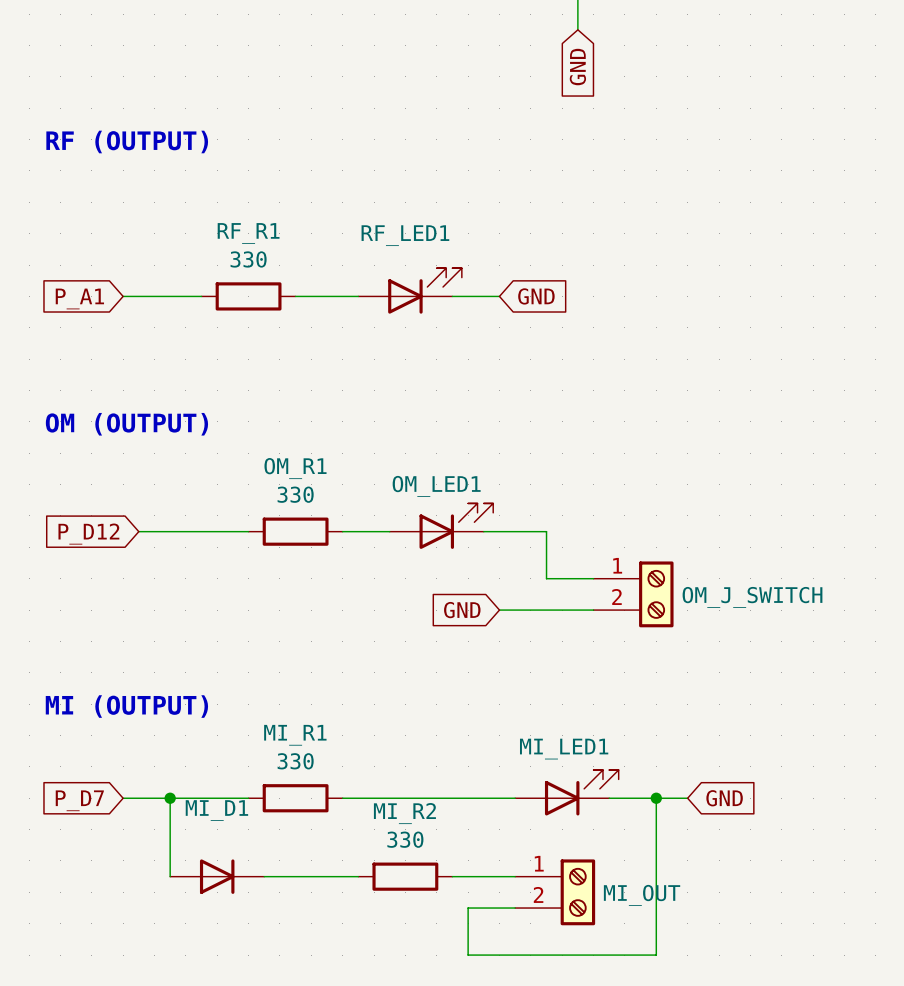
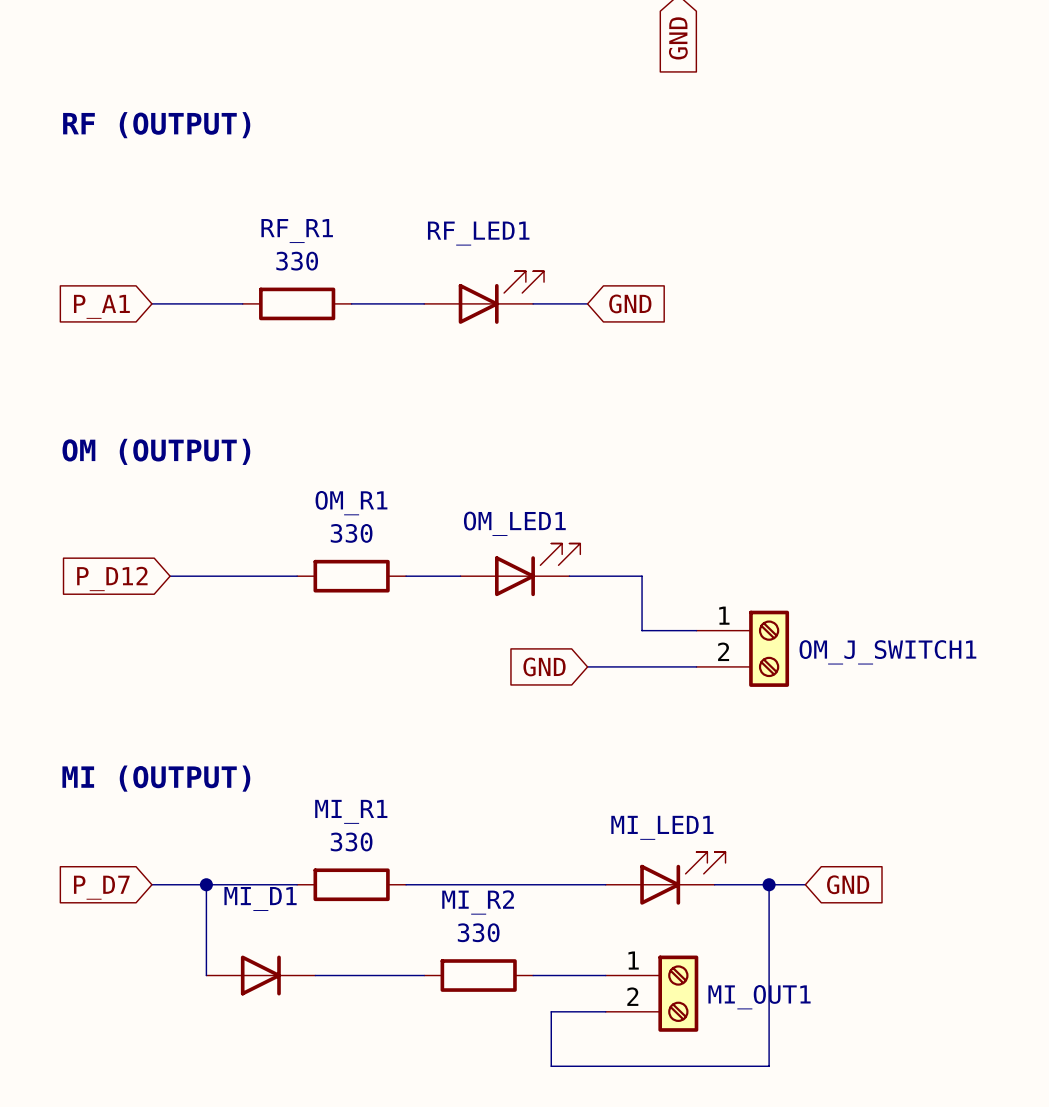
OM_J_SWITCH name: OM_J_SWITCH (752, 597) -> OM_J_SWITCH1 (887, 652)
MI_OUT name: MI_OUT (642, 895) -> MI_OUT1 (759, 997)

